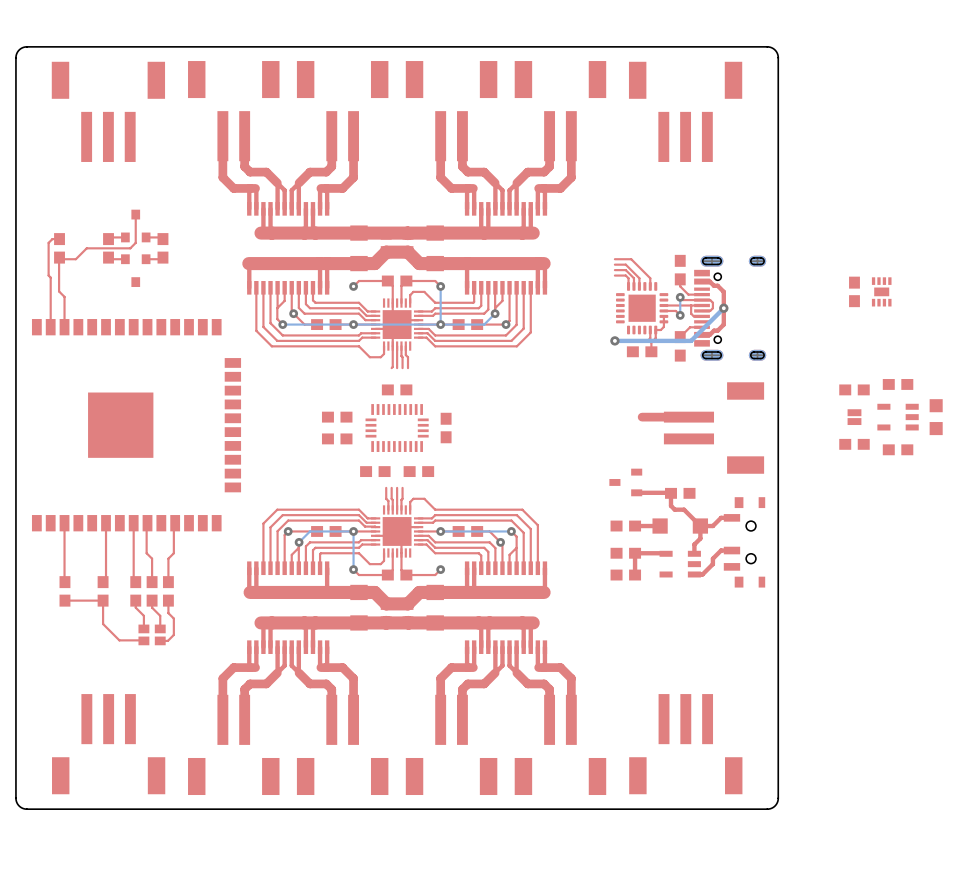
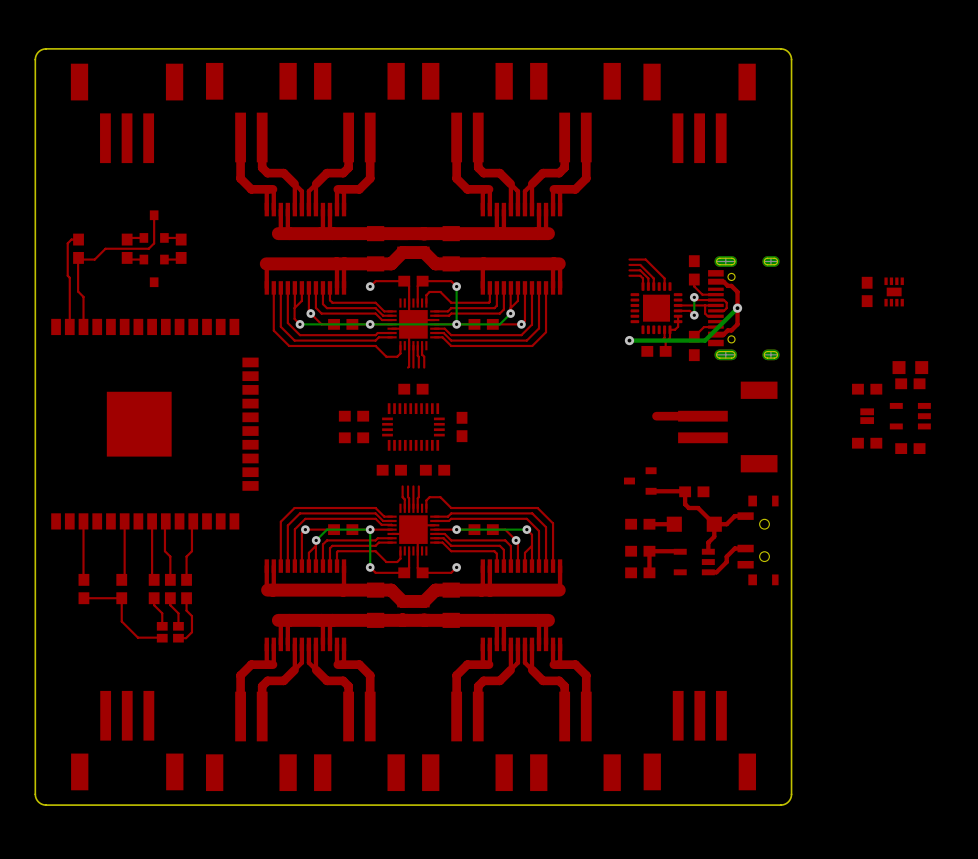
part rotation: 0° (936, 417) -> 90° clockwise (910, 367)
part position: (936, 417) -> (910, 367)

